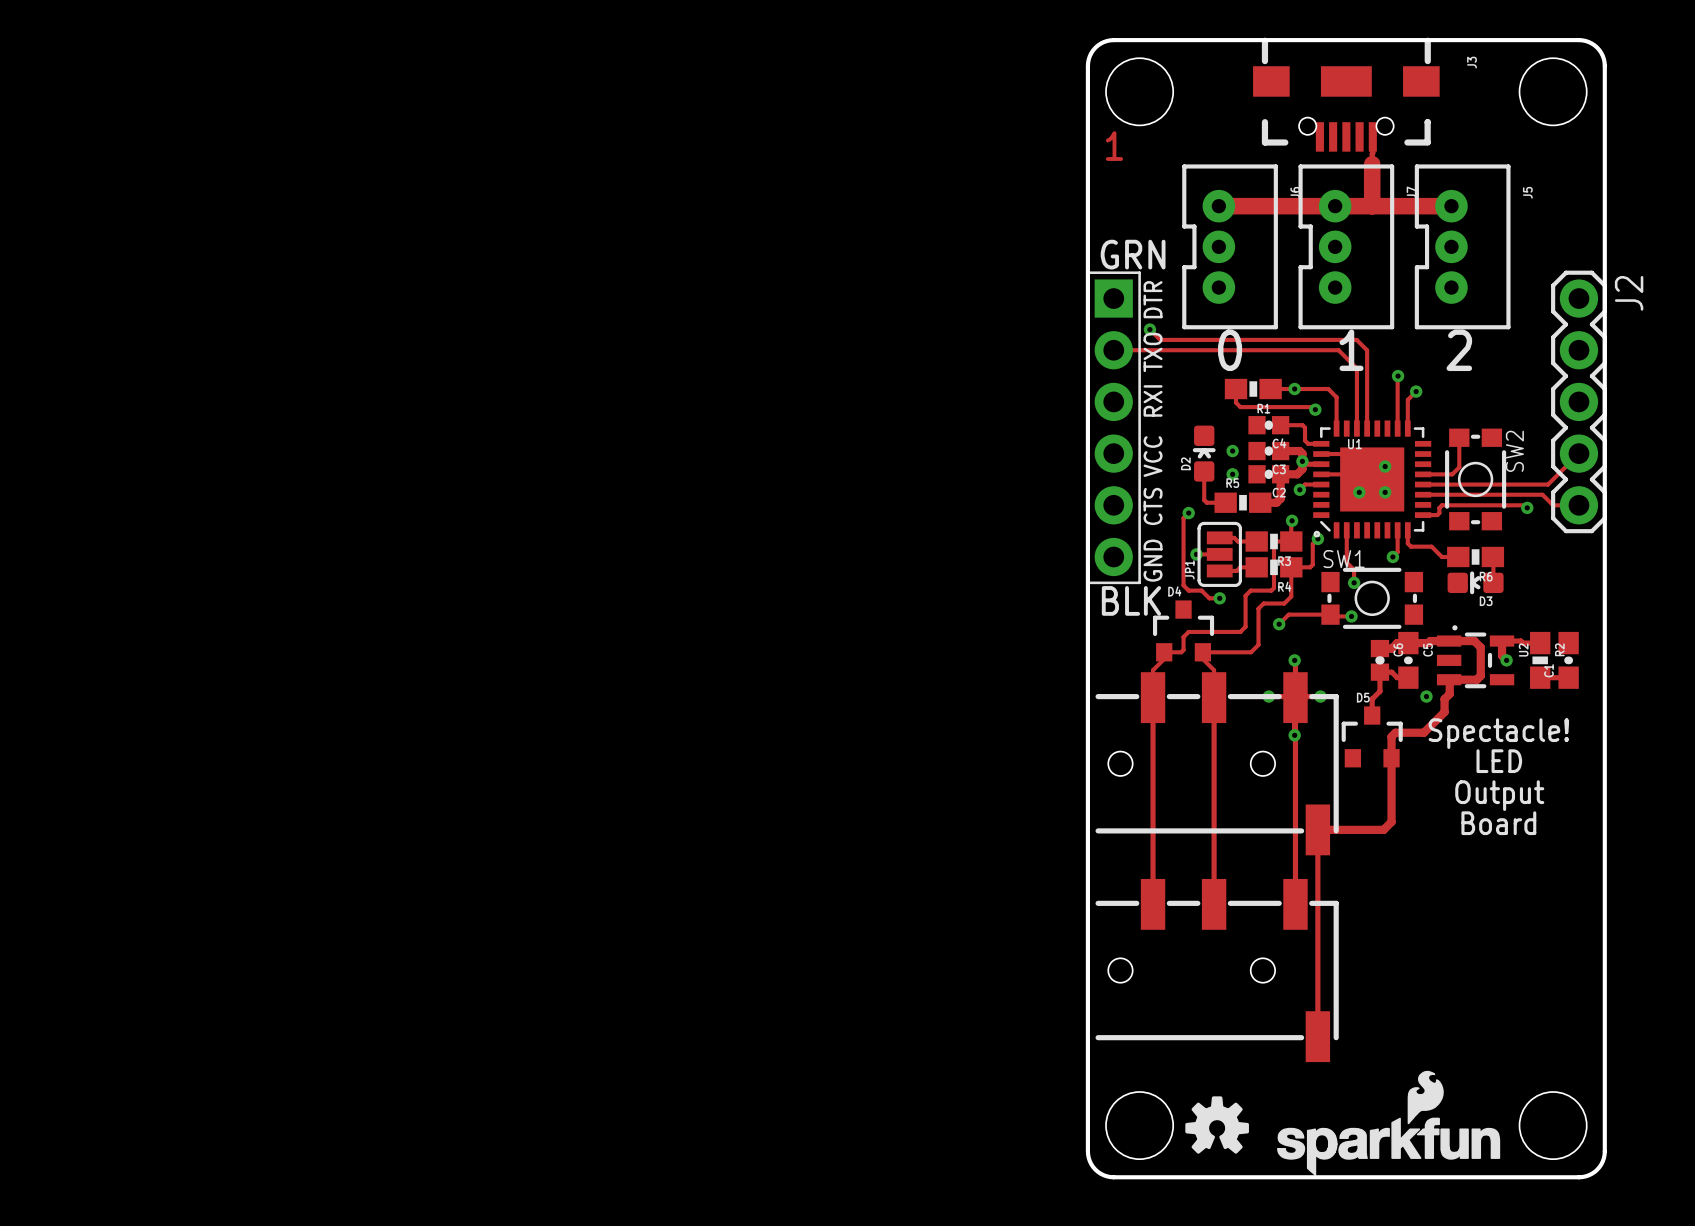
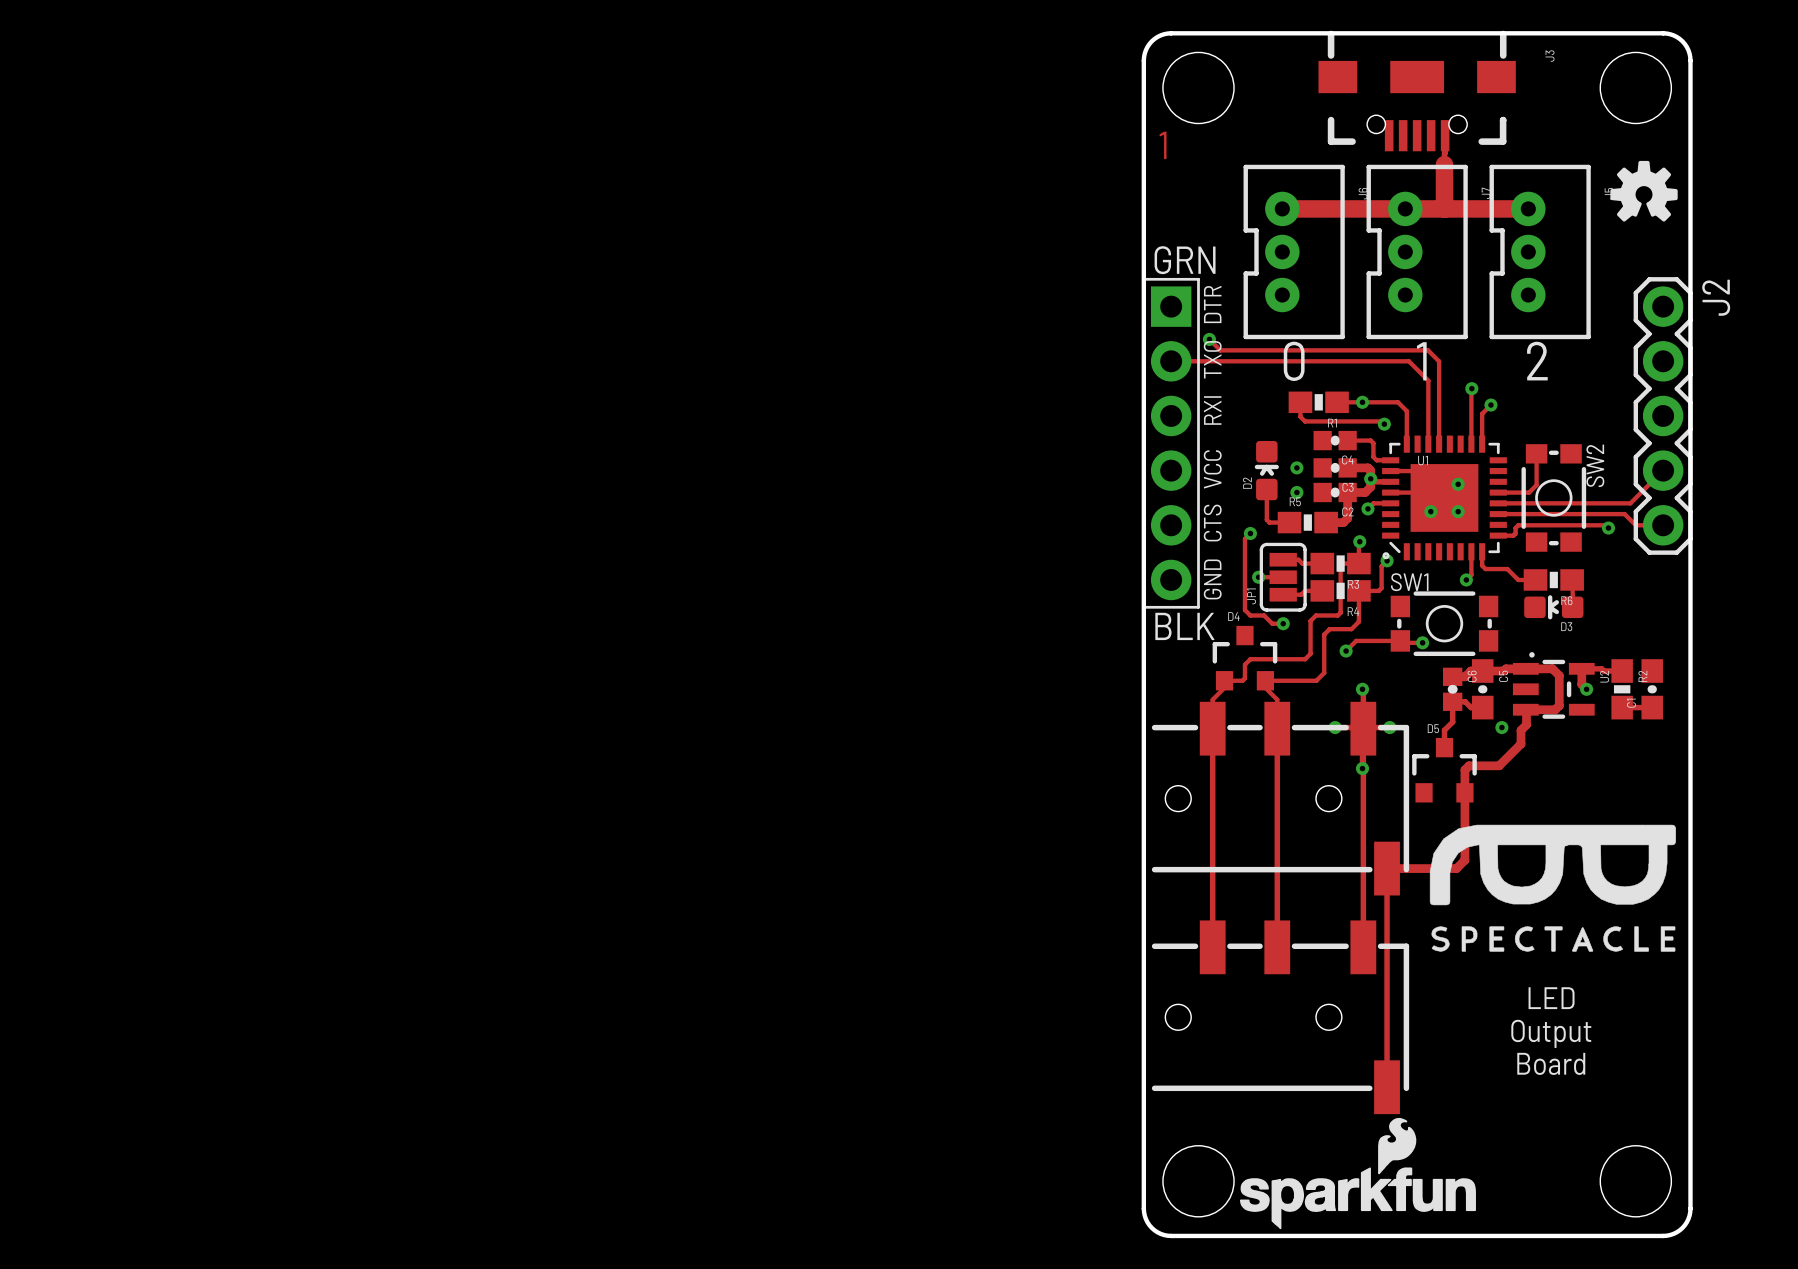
drawing: none -> [1610, 160, 1678, 222]
track: (1346, 530) (1346, 562) (1354, 569) (1354, 582) -> none
via: (1354, 582) -> none
text: Spectacle! (1498, 733) -> none
text position: LED (1499, 761) -> LED (1551, 998)
drawing: none -> [1429, 824, 1676, 952]
text position: Output (1499, 795) -> Output (1551, 1033)
text position: Board (1498, 823) -> Board (1551, 1063)
drawing: [1185, 1096, 1249, 1154] -> none
drawing position: (1388, 1123) -> (1357, 1173)

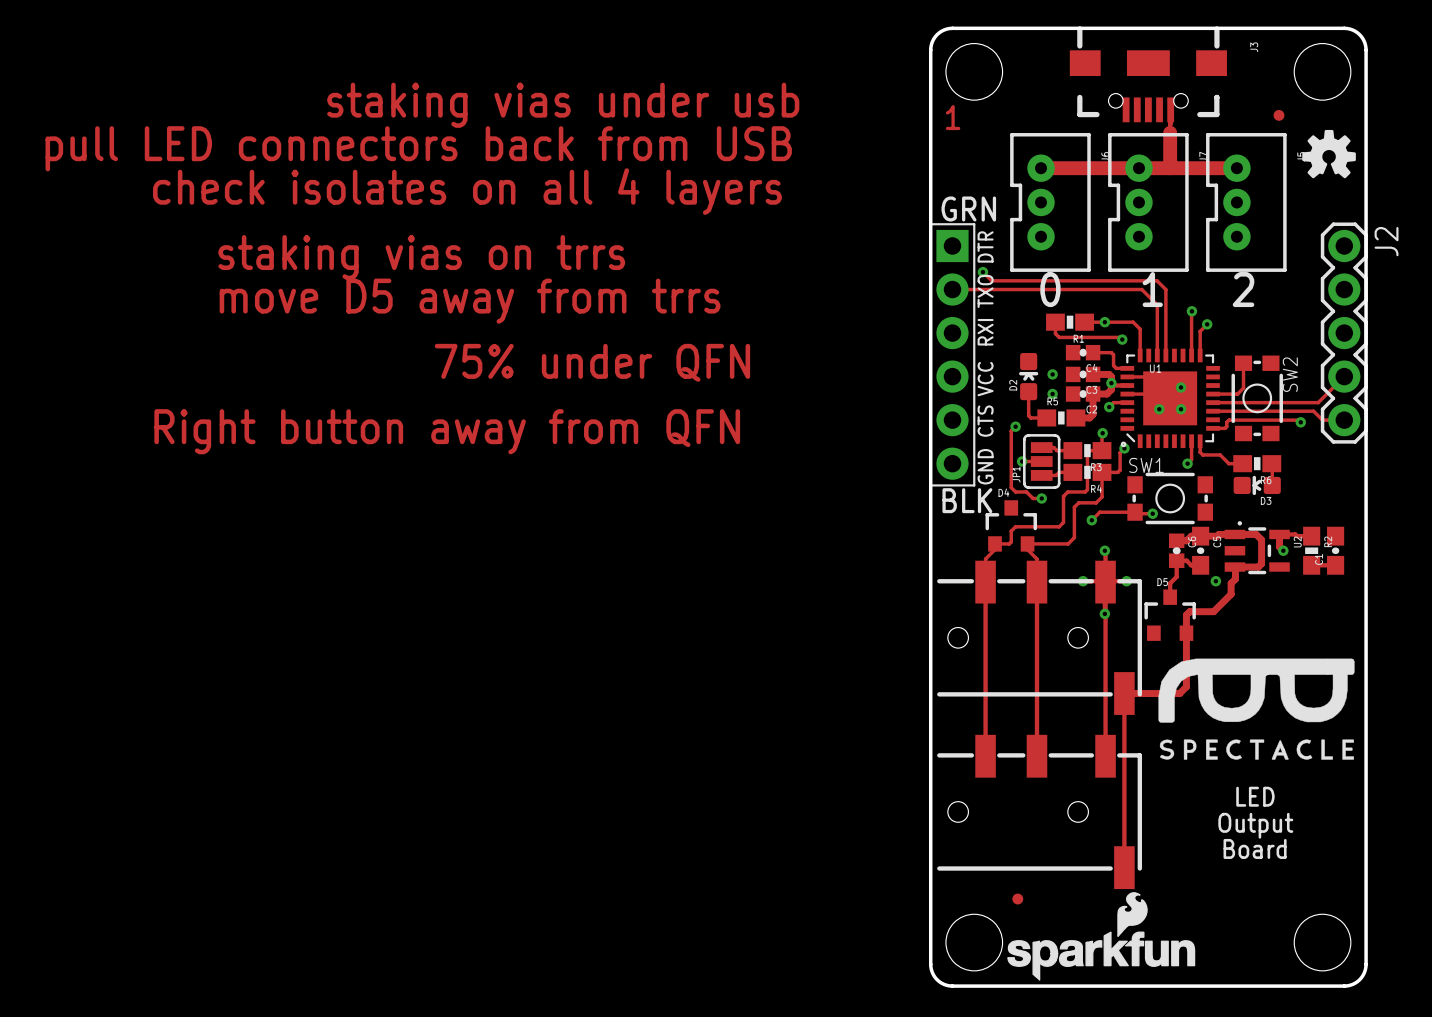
text: none -> staking vias under usb (563, 105)
part: none -> (1279, 115)
text: none -> pull LED connectors back from USB (418, 148)
text: none -> check isolates on all 4 layers (467, 191)
text: none -> staking vias on trrs (421, 257)
text: none -> move D5 away from trrs (470, 301)
text: none -> 75% under QFN (592, 362)
text: none -> Right button away from QFN (447, 431)
part: none -> (1017, 899)

